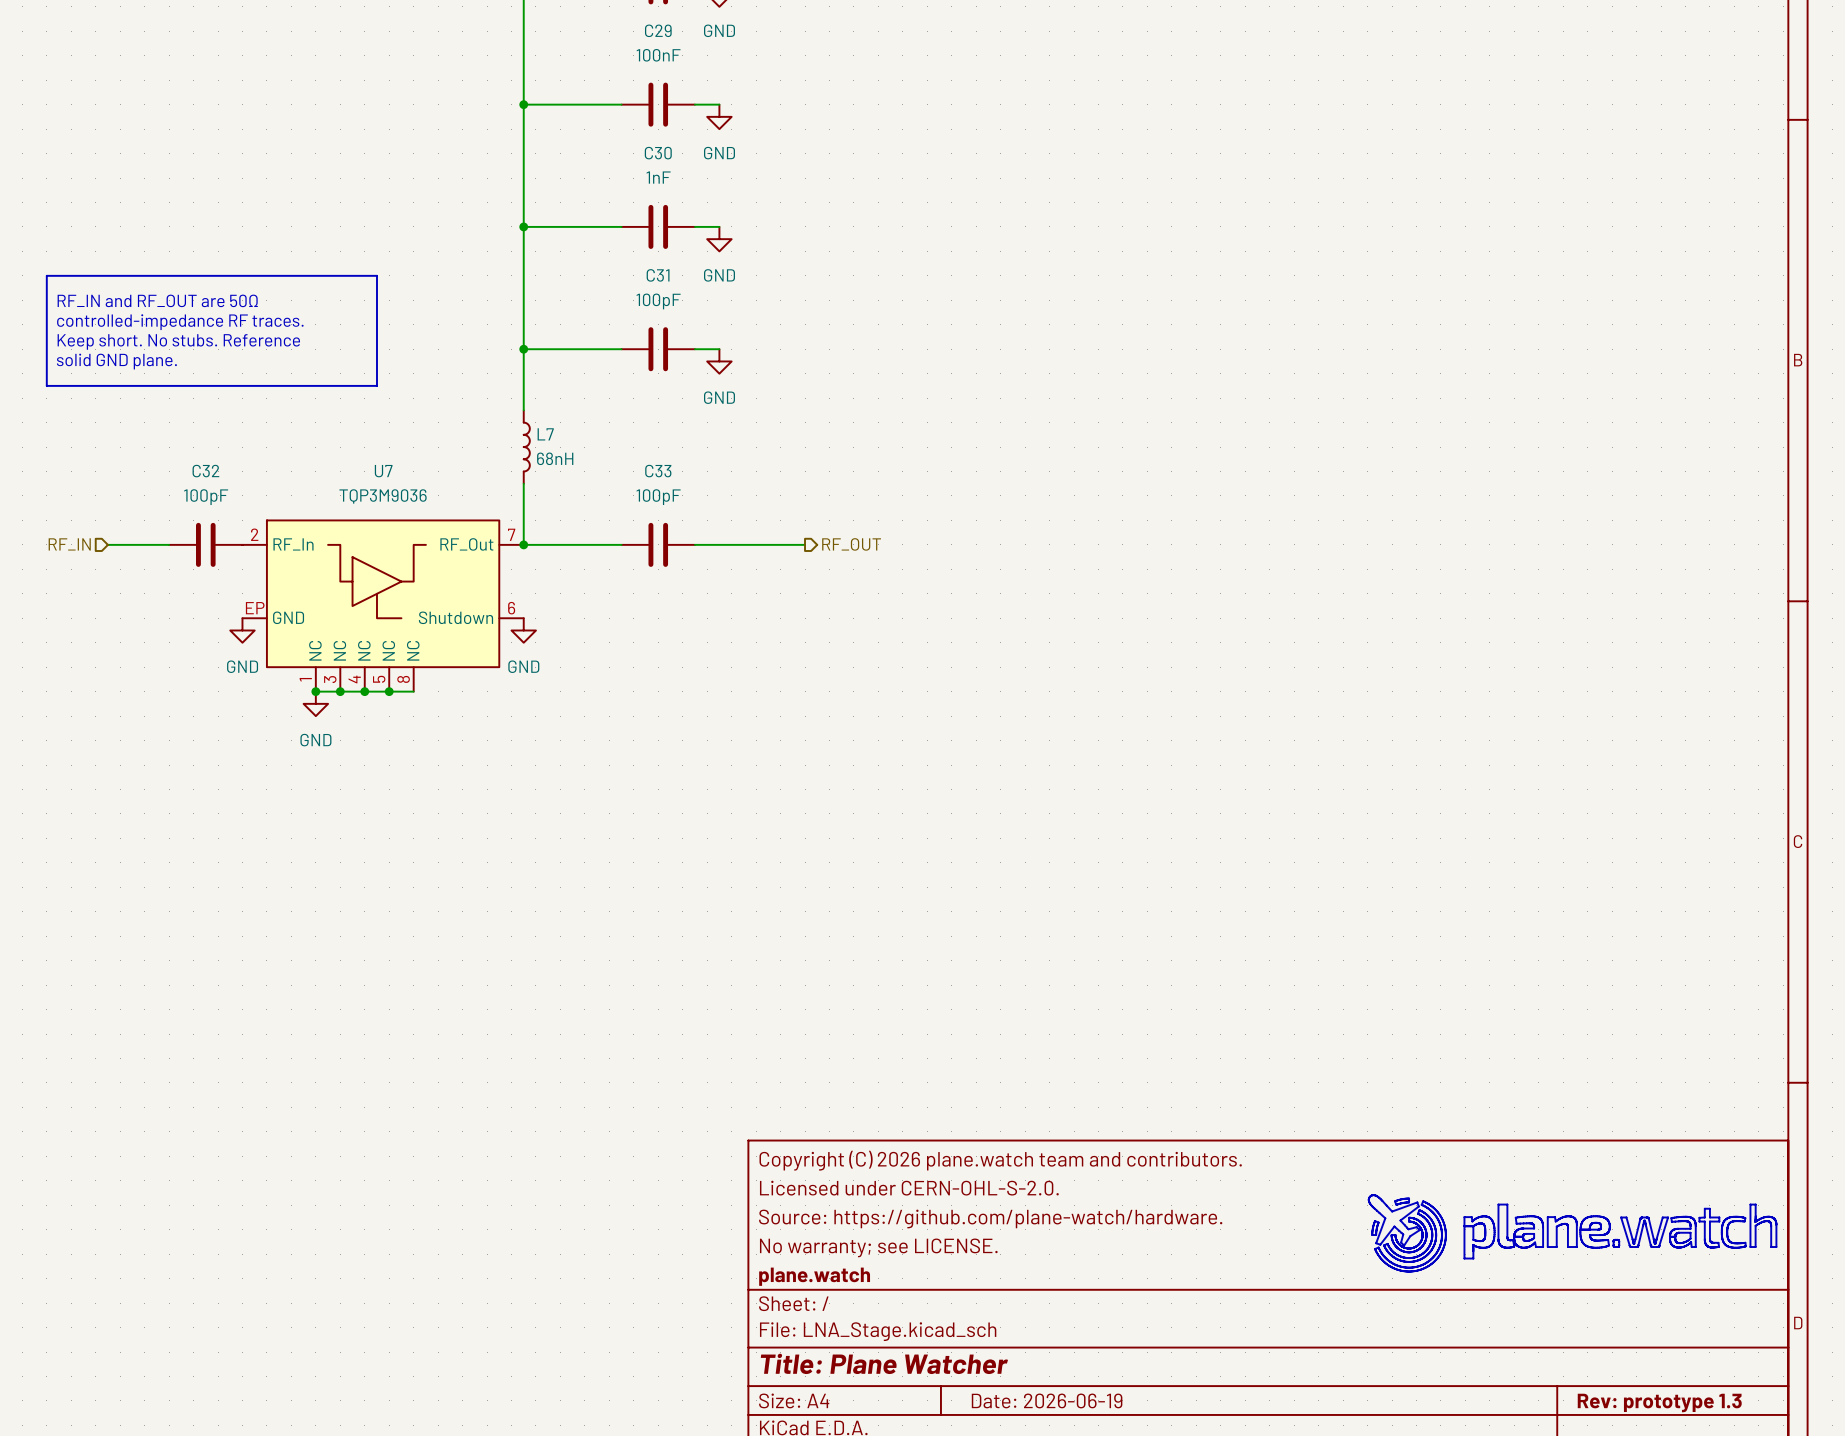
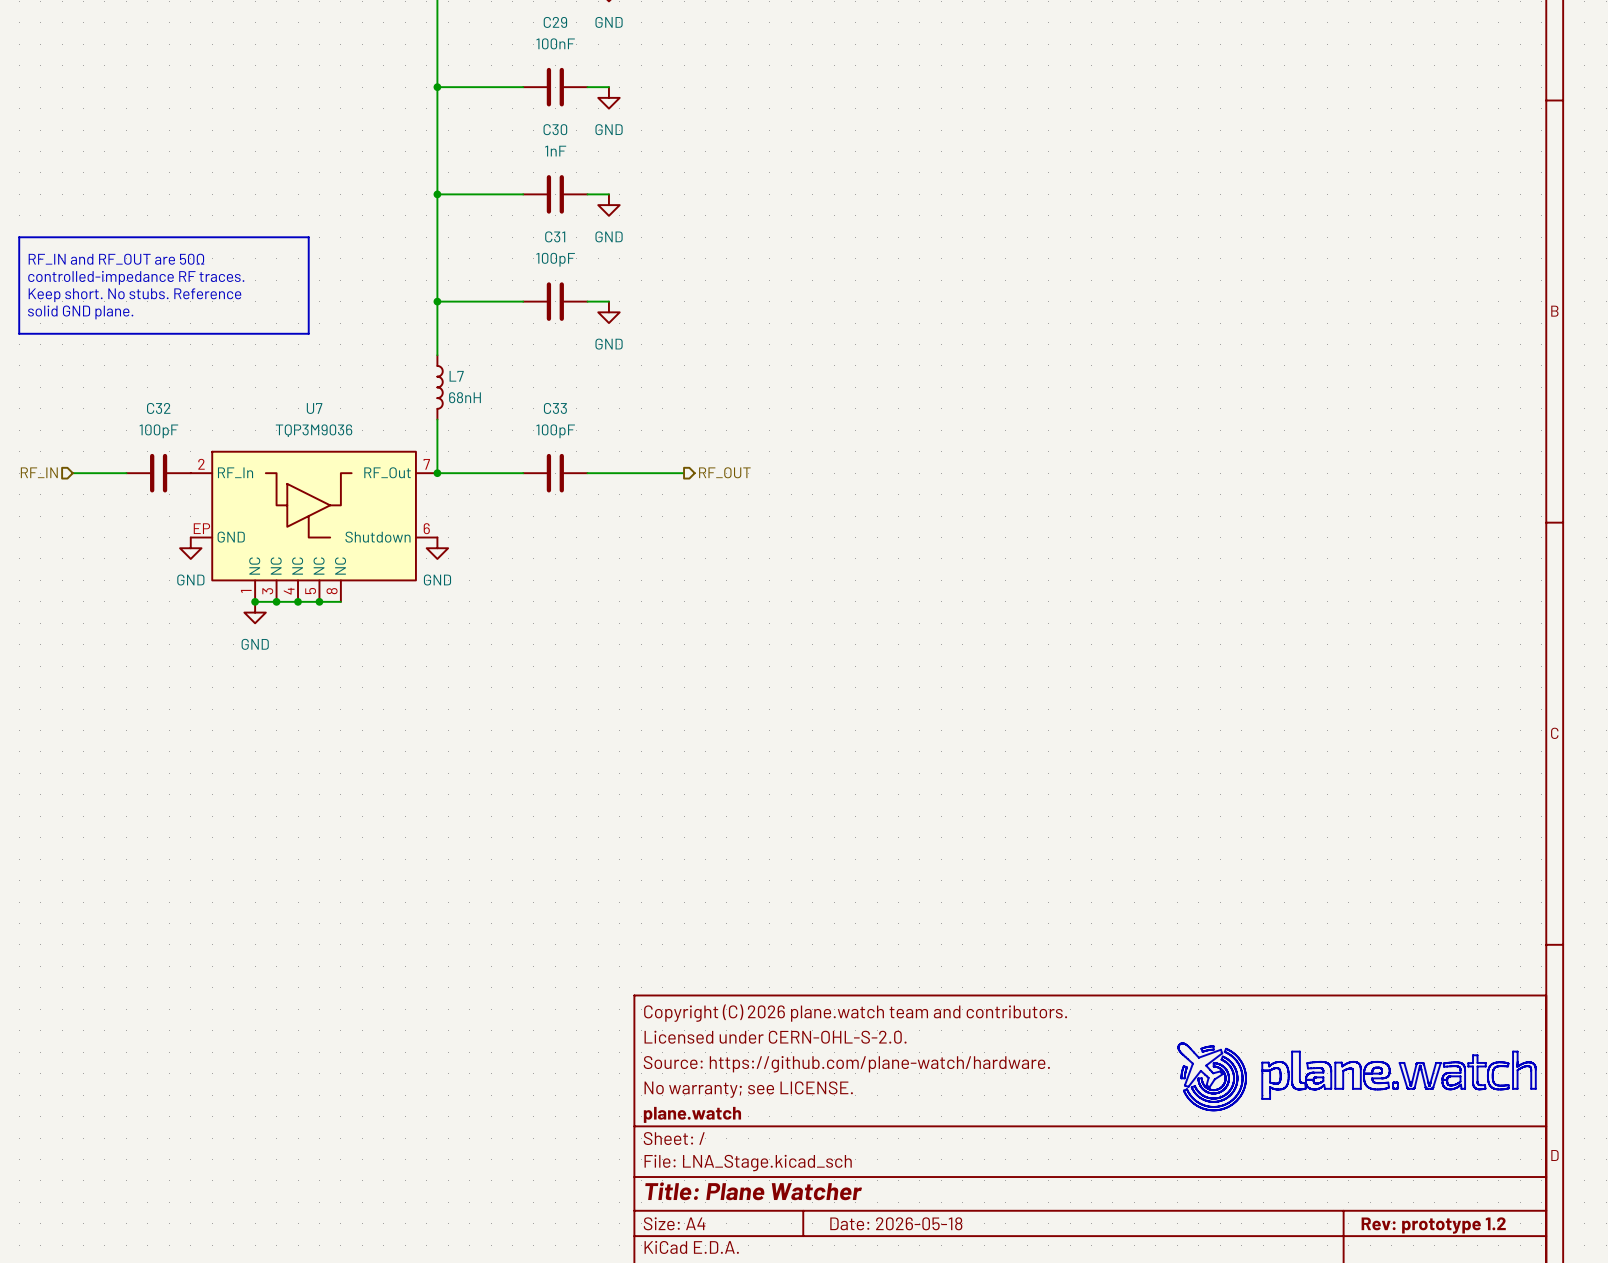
title block: Date: 2026-06-19 (1047, 1400) -> Date: 2026-05-18 (896, 1223)
title block: Rev: prototype 1.3 (1659, 1403) -> Rev: prototype 1.2 (1433, 1225)

